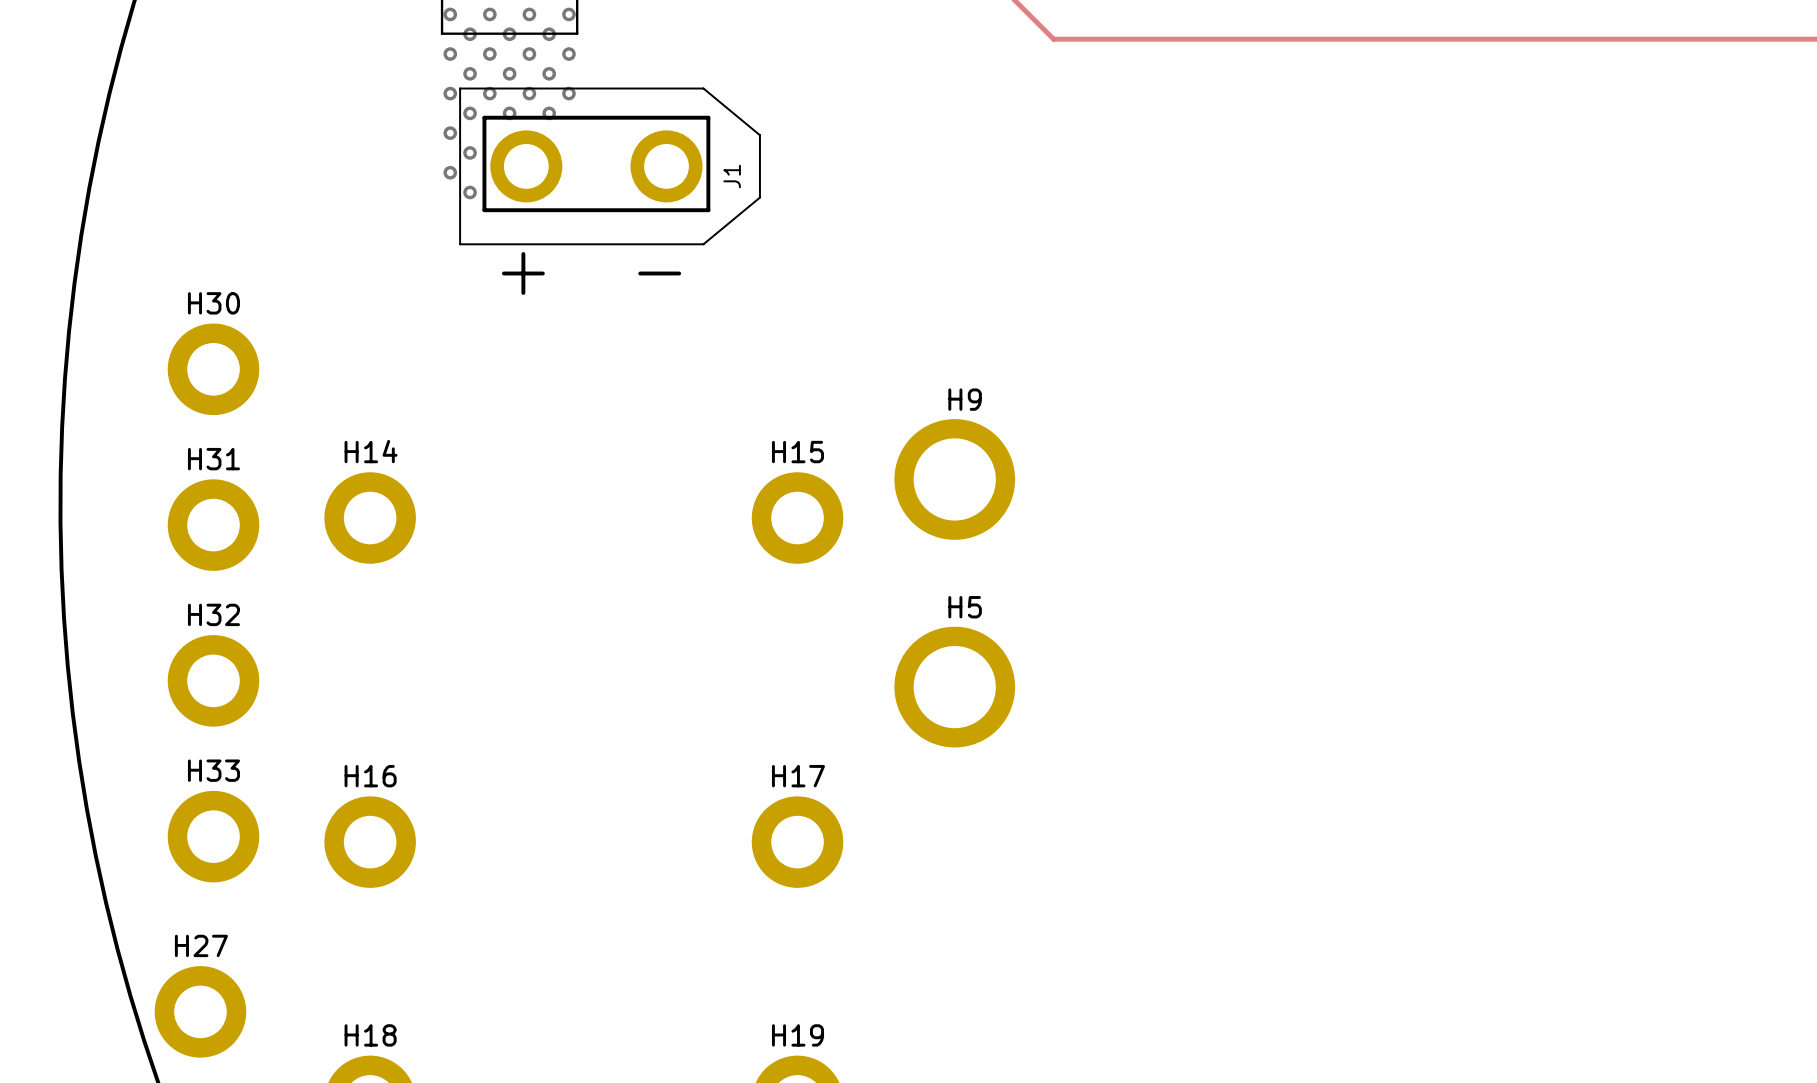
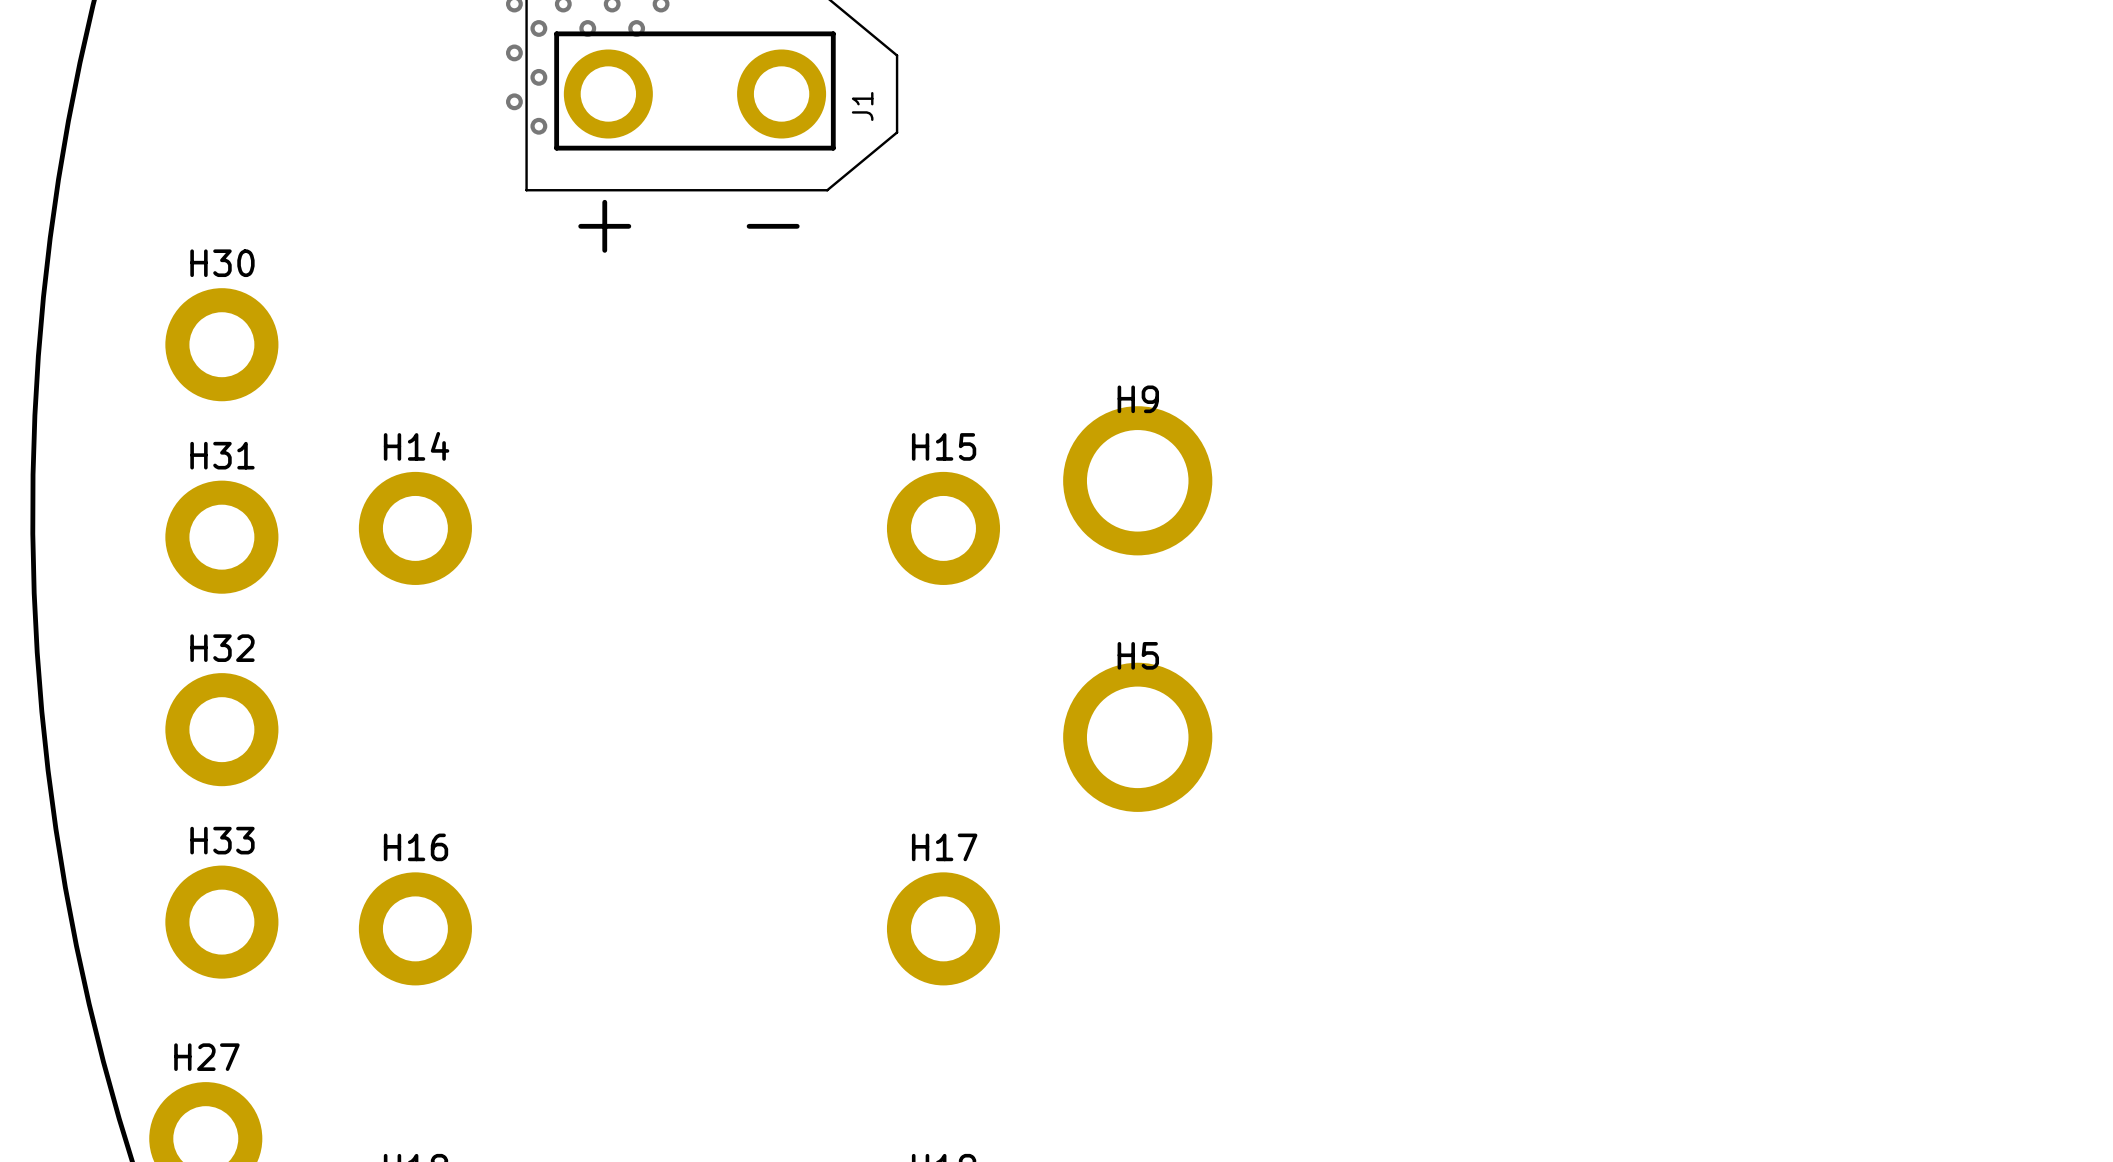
H9 name position: H9 (965, 399) -> H9 (1138, 399)
H5 name position: H5 (965, 607) -> H5 (1138, 655)

